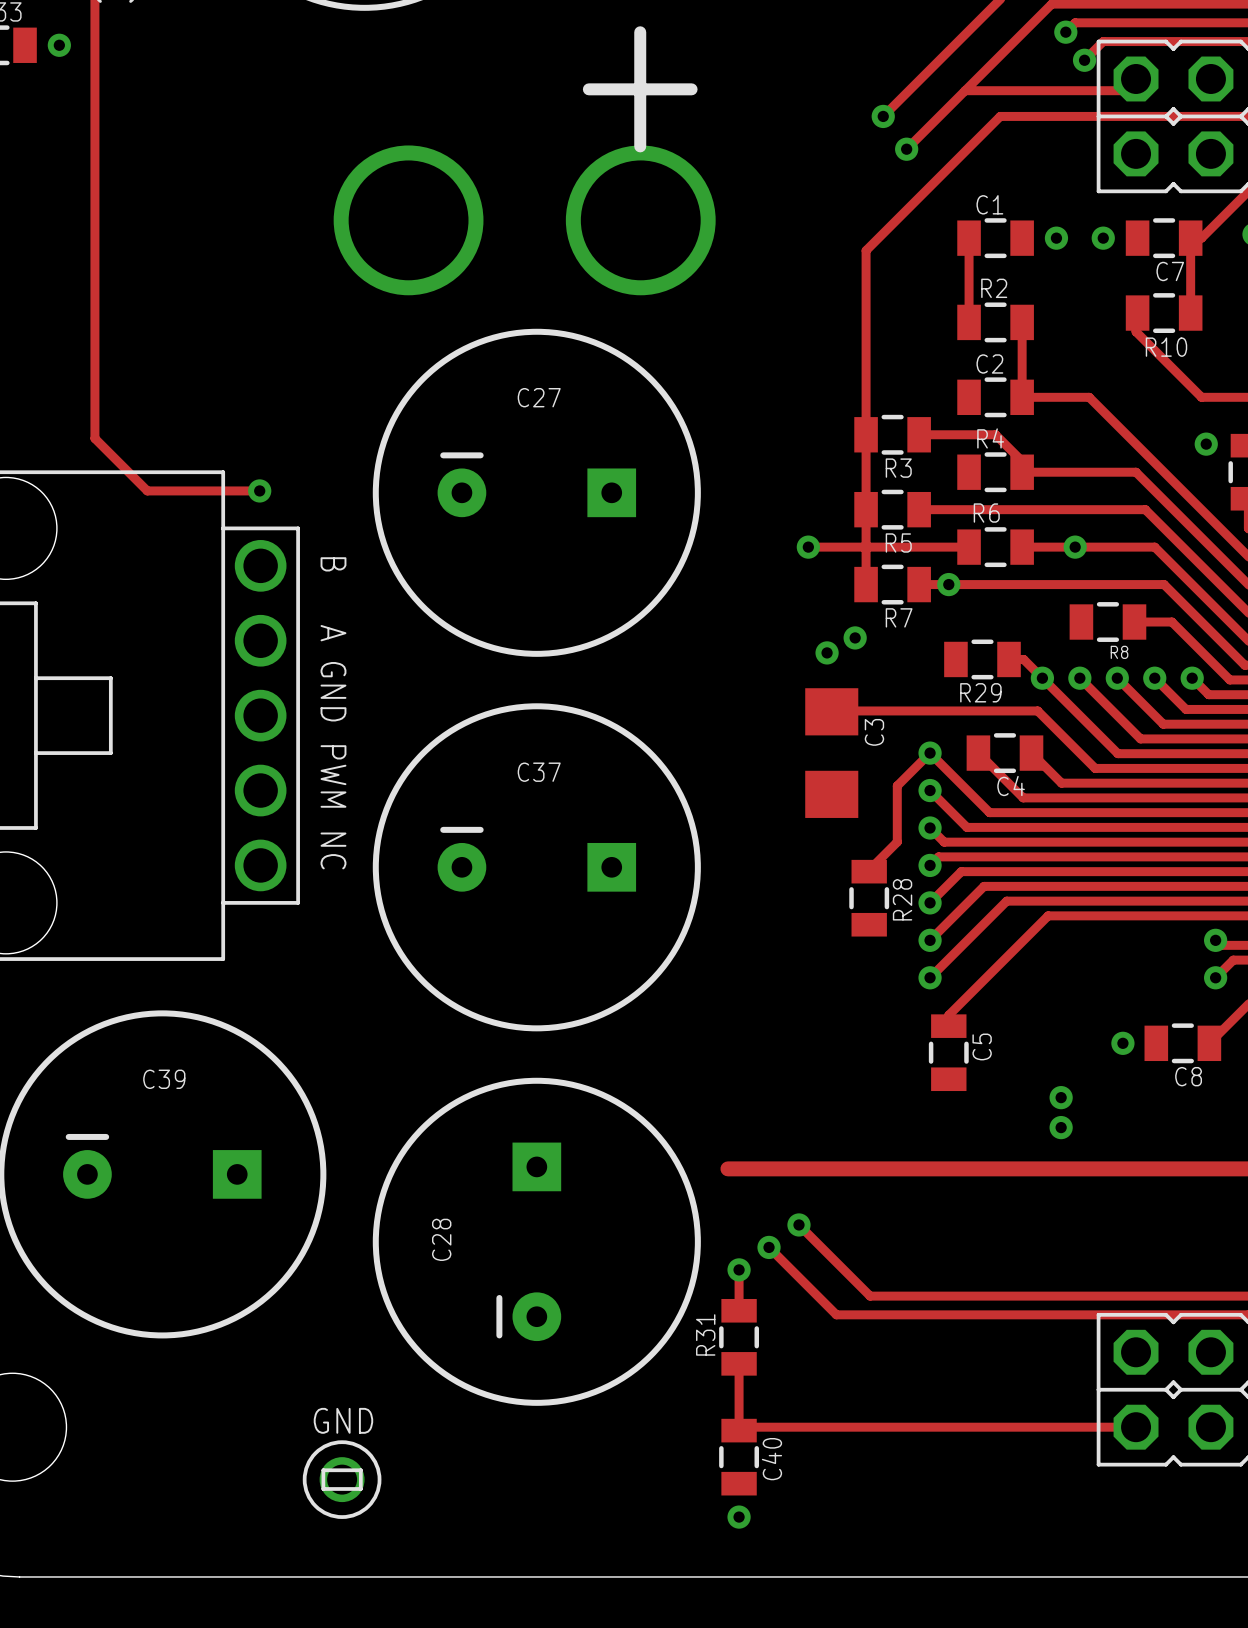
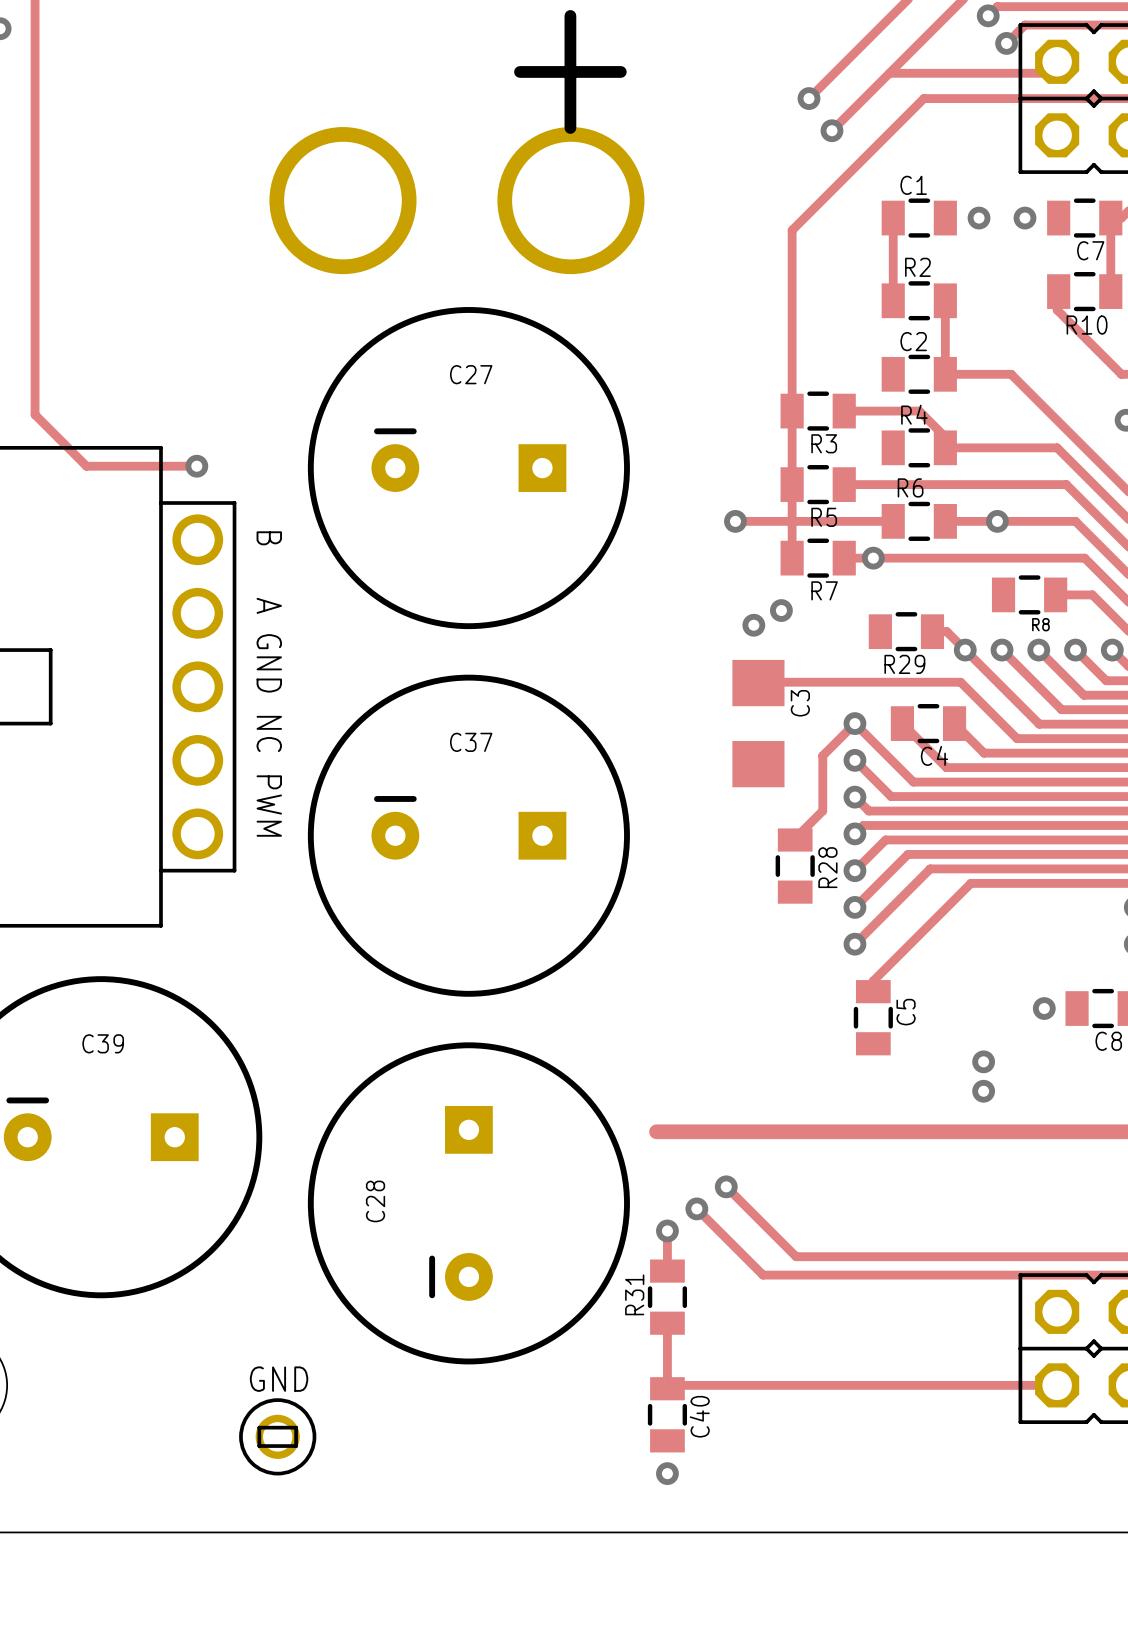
text: B A GND PWM NC (333, 713) -> B A GND NC PWM (269, 684)

